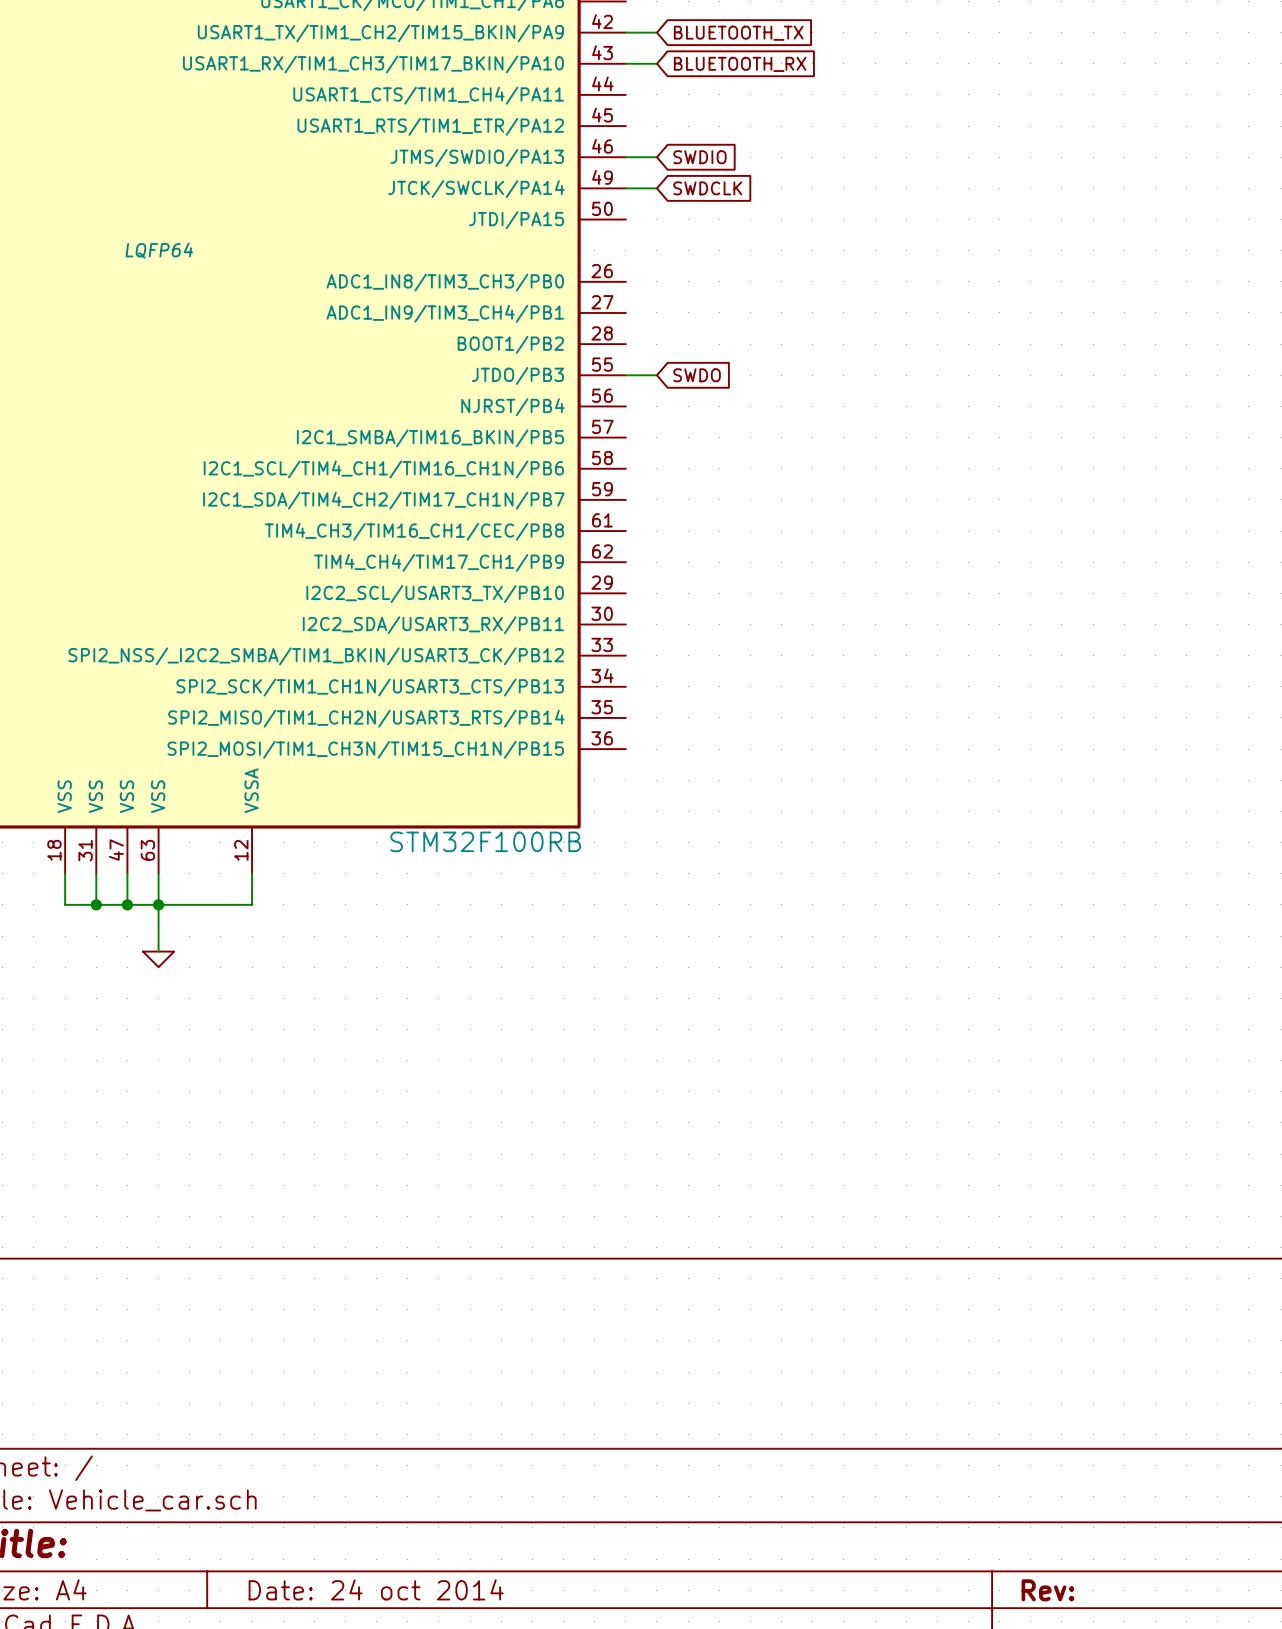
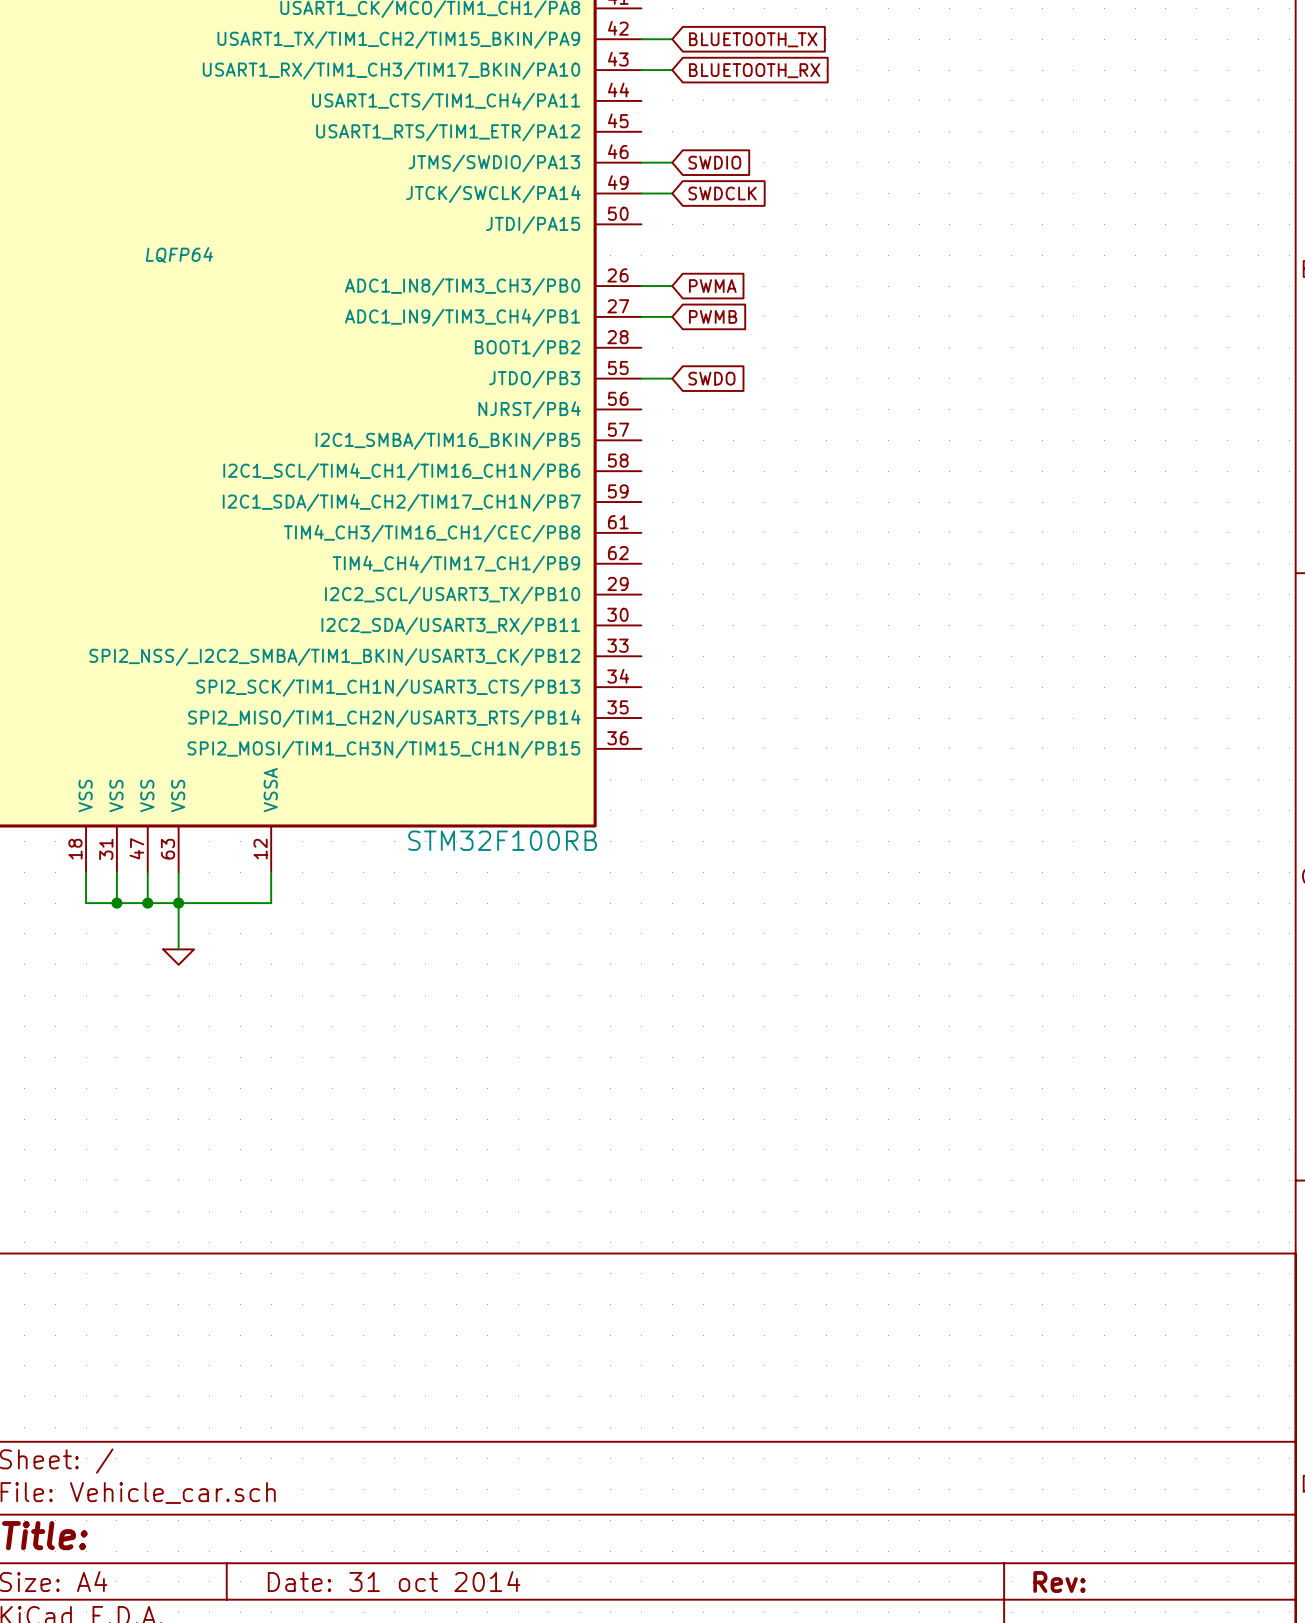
wire: none -> (641, 286) (672, 286)
global label: none -> PWMA (712, 286)
wire: none -> (641, 316) (672, 316)
global label: none -> PWMB (713, 316)
title block: Date: 24 oct 2014 (376, 1589) -> Date: 31 oct 2014 (394, 1581)

